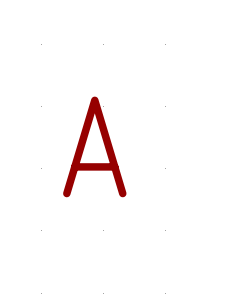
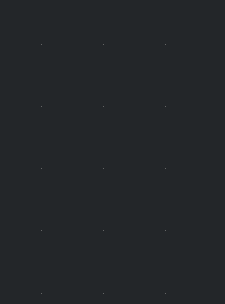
text: A (94, 146) -> none

